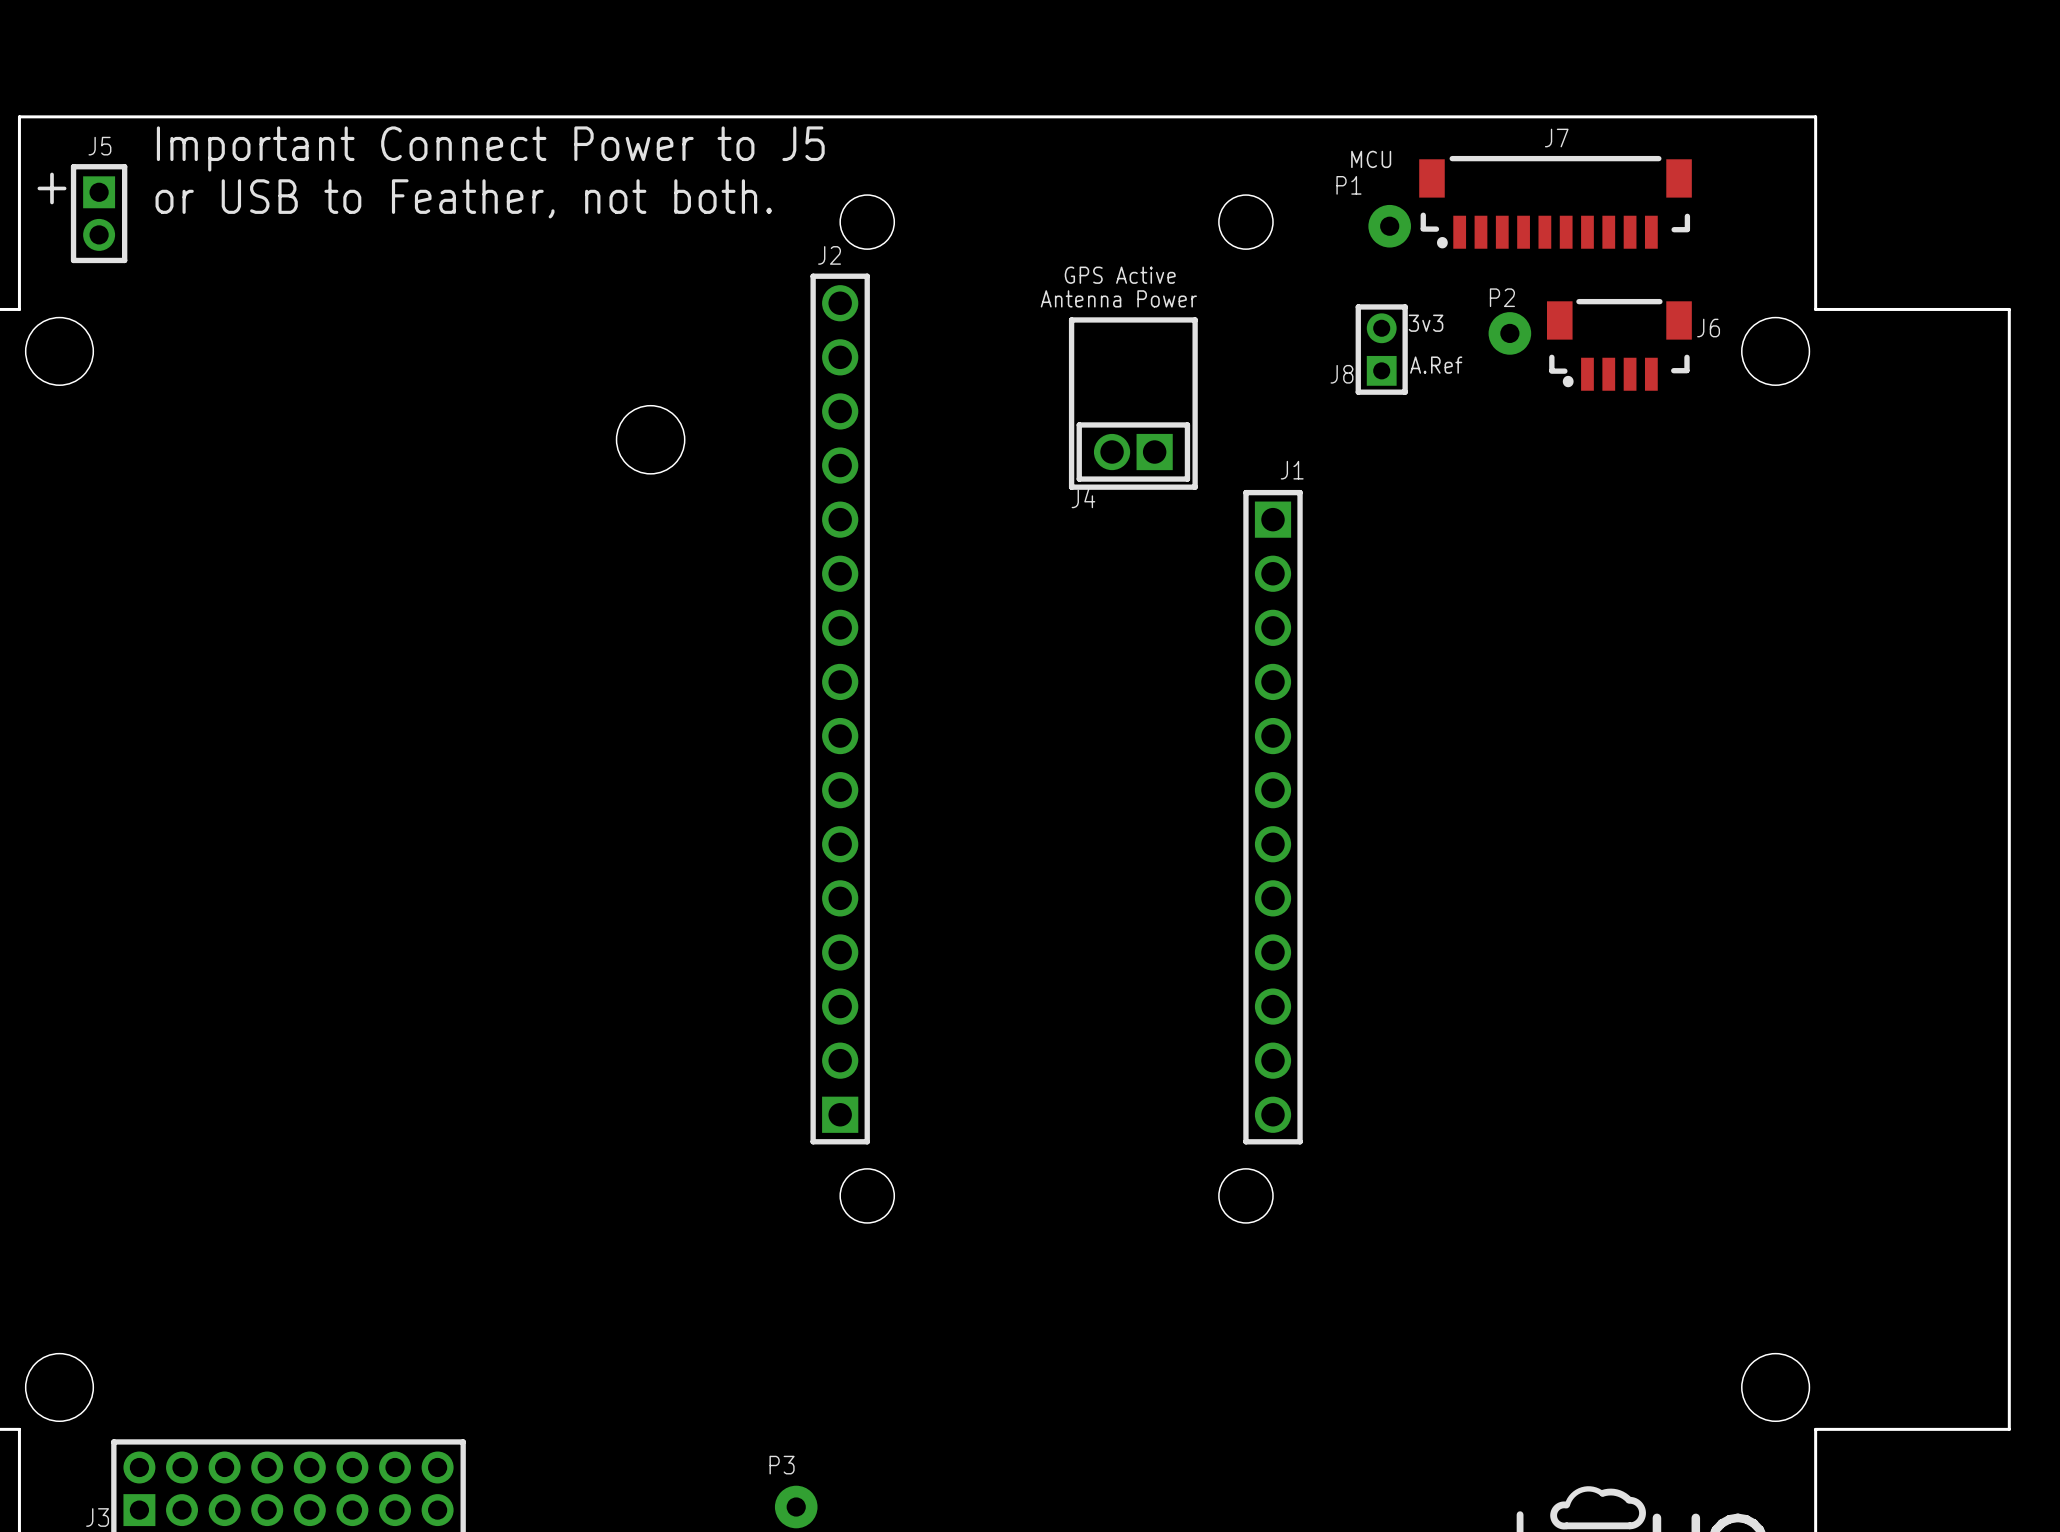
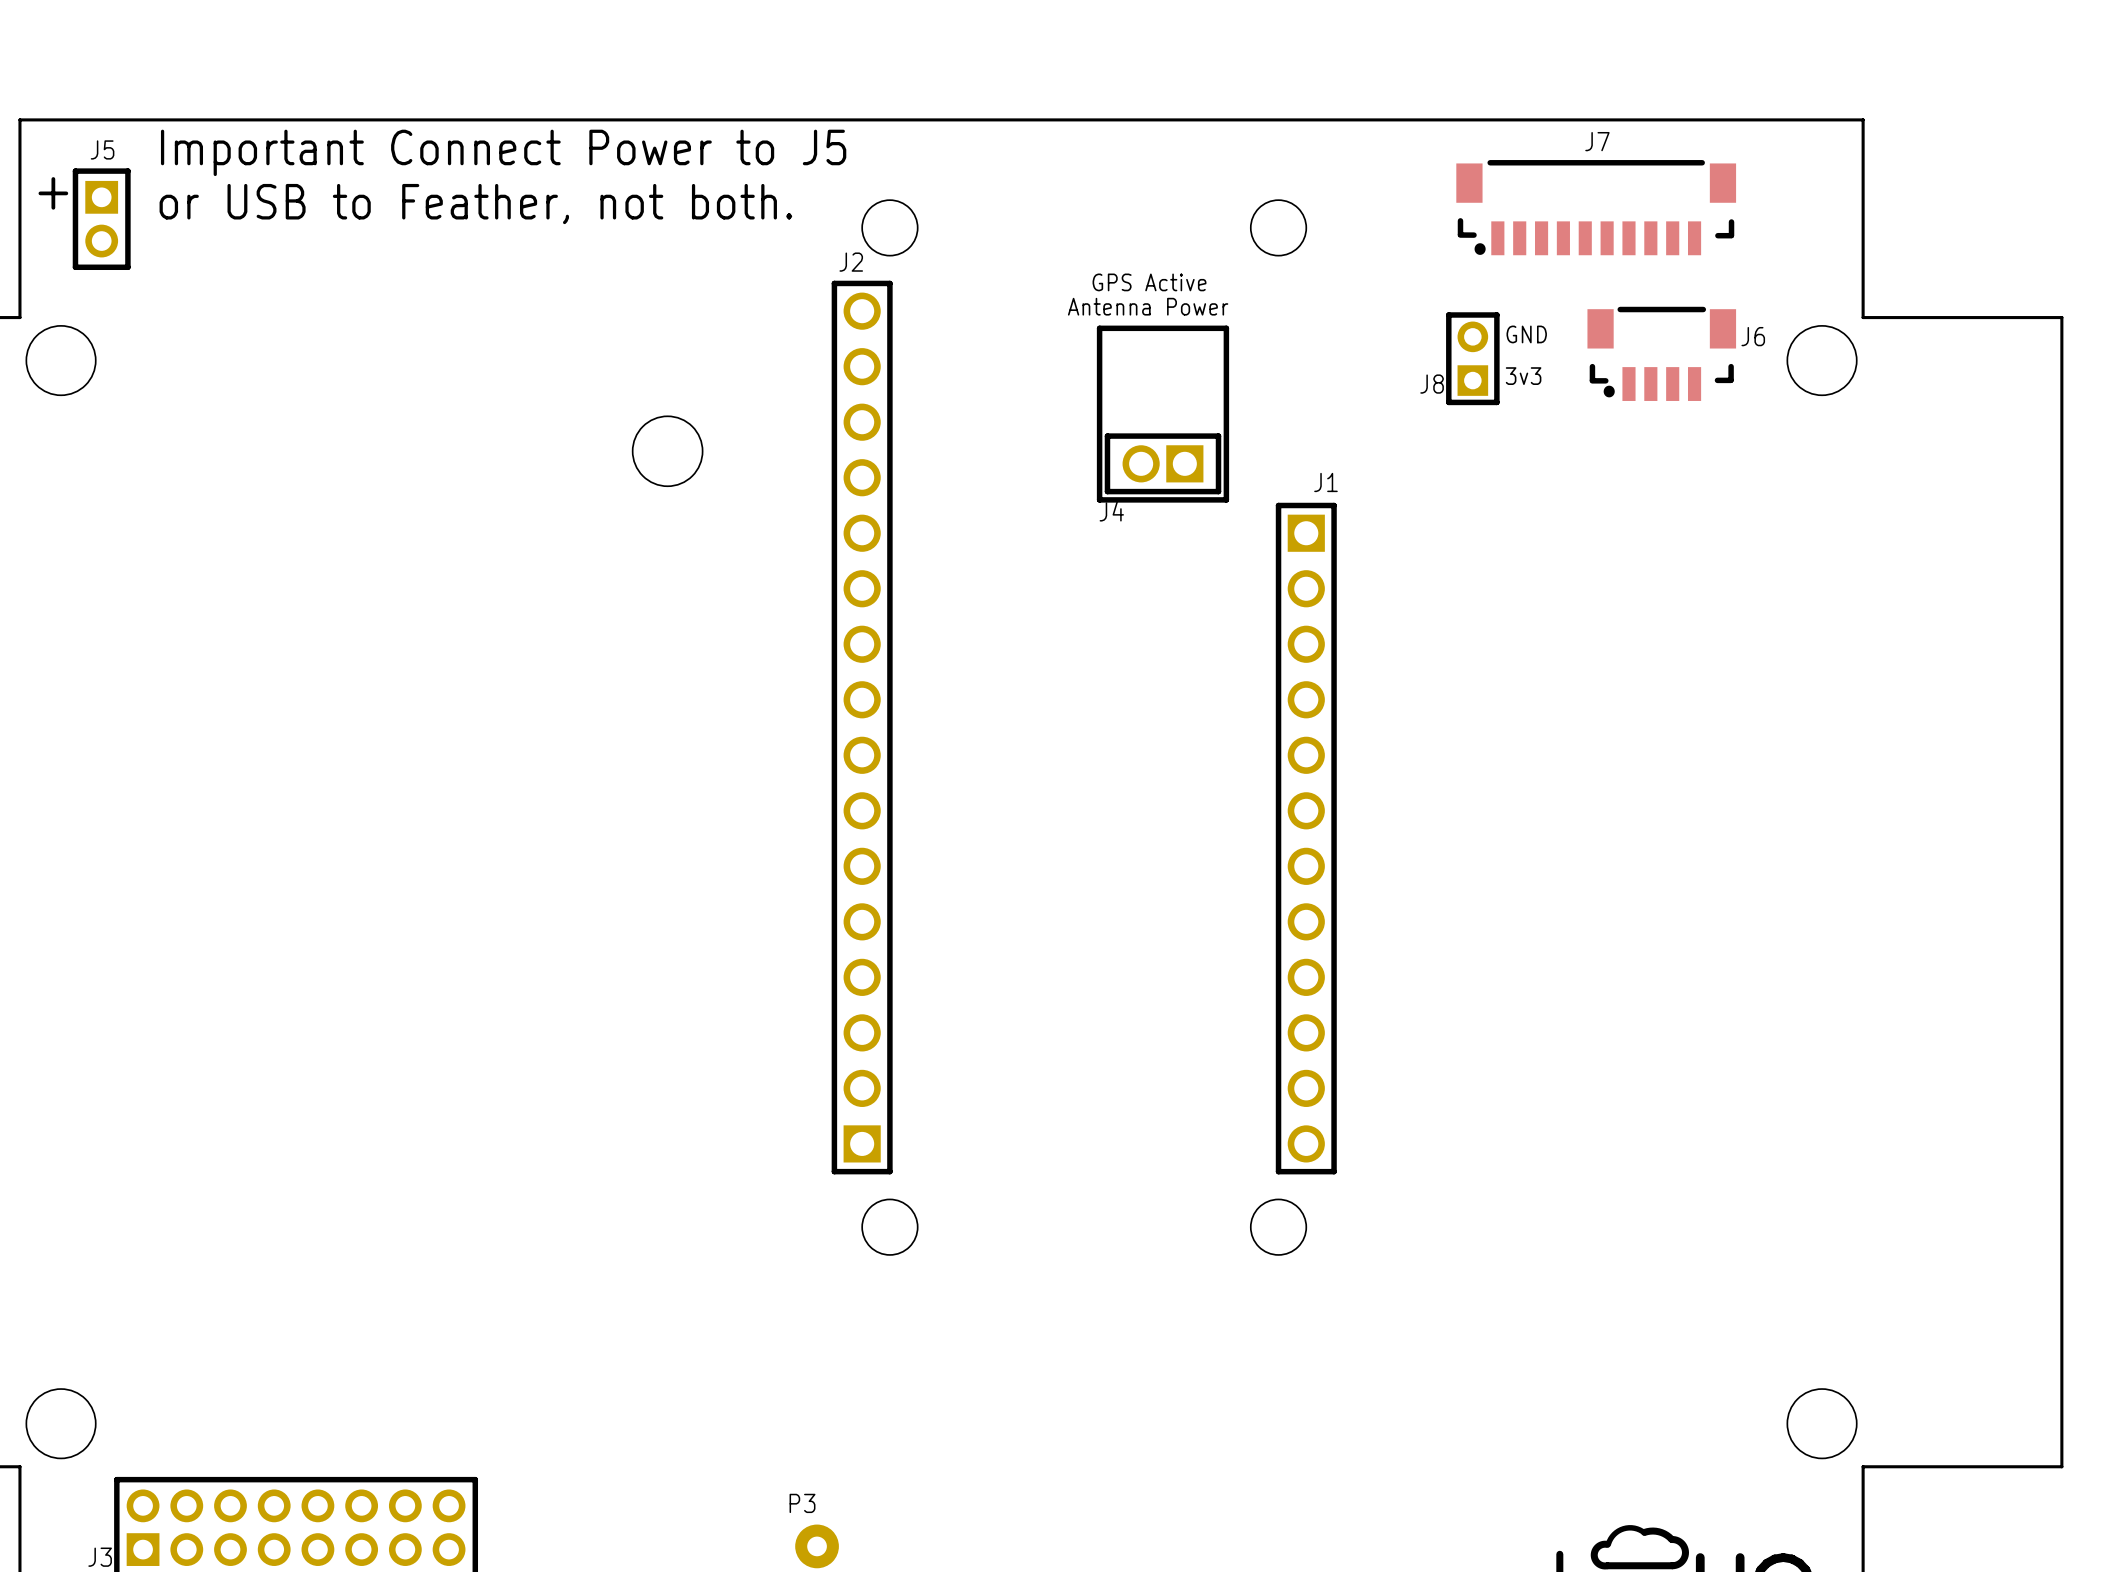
text: MCU (1371, 159) -> none
P1: (1389, 226) -> none
text position: 3v3 (1426, 323) -> 3v3 (1523, 376)
text: none -> GND (1526, 334)
P2: (1509, 333) -> none
J8 position: (1381, 349) -> (1472, 358)
text: A.Ref (1436, 365) -> none

